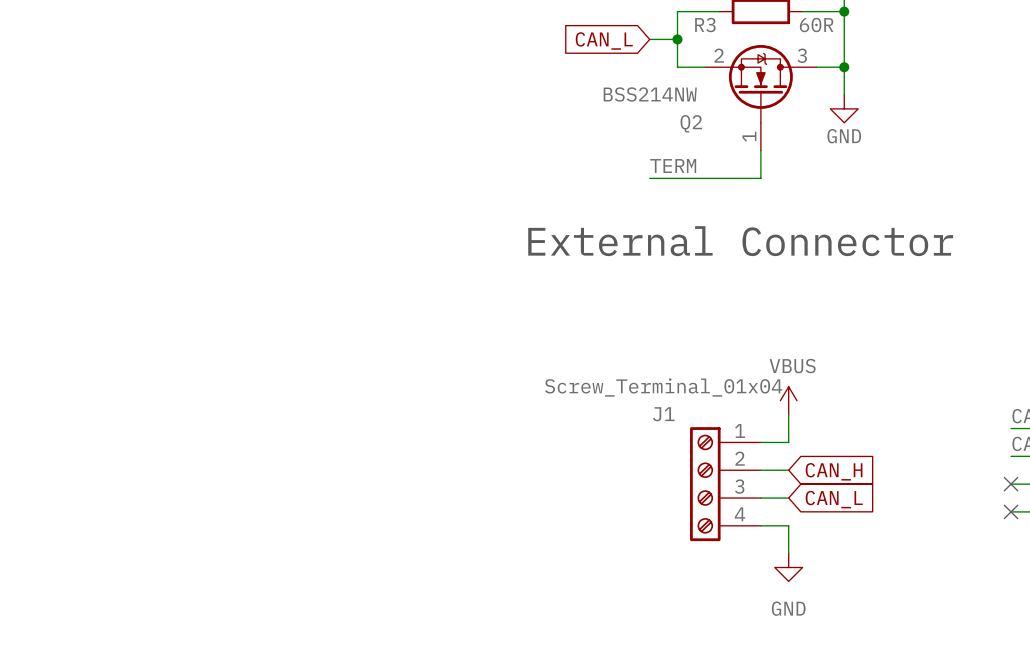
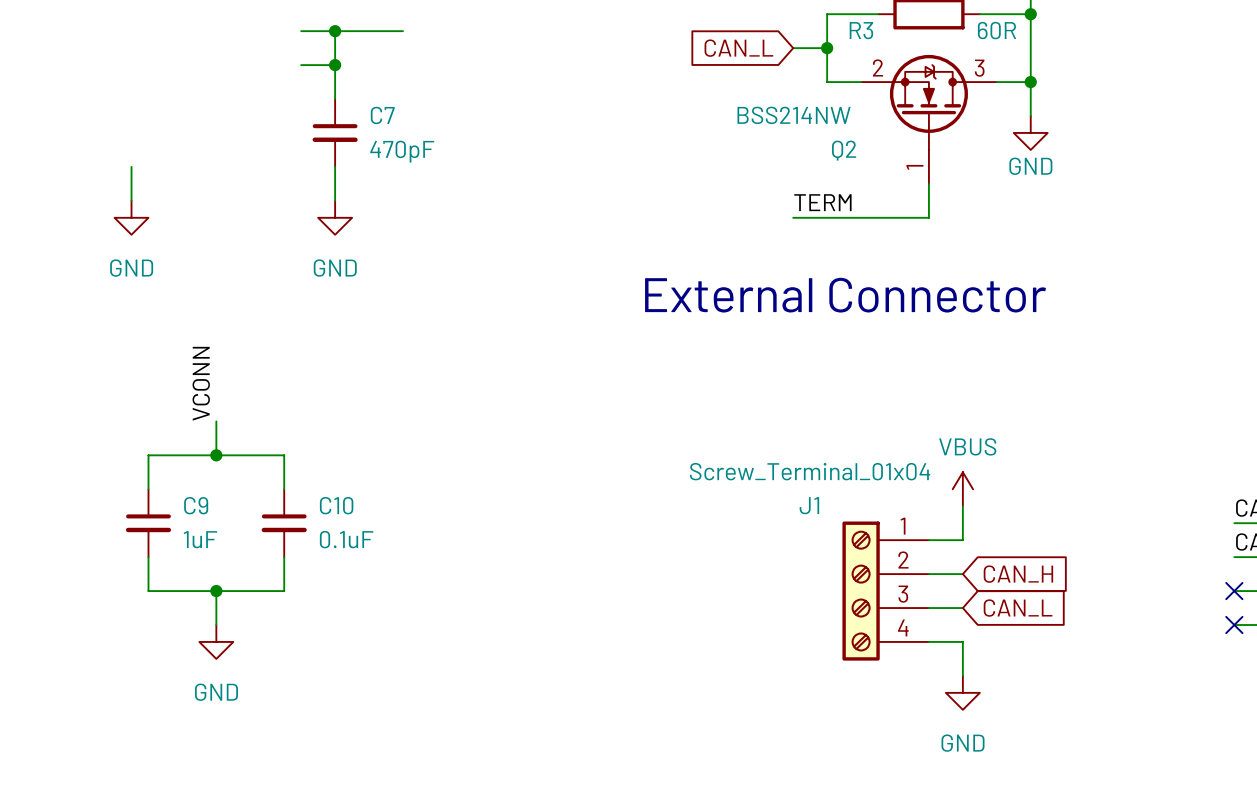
wire: none -> (301, 31) (402, 31)
wire: none -> (335, 31) (335, 99)
junction: none -> (335, 31)
wire: none -> (301, 65) (335, 65)
junction: none -> (335, 65)
C7: none -> 470pF (335, 132)
wire: none -> (131, 166) (131, 200)
wire: none -> (335, 166) (335, 200)
power symbol: none -> GND (131, 217)
power symbol: none -> GND (335, 217)
label: none -> VCONN (201, 383)
wire: none -> (216, 421) (216, 455)
junction: none -> (216, 455)
wire: none -> (148, 489) (148, 455) (284, 455) (284, 489)
C9: none -> 1uF (148, 523)
C10: none -> 0.1uF (284, 523)
wire: none -> (148, 557) (148, 591) (284, 591) (284, 557)
wire: none -> (216, 591) (216, 624)
junction: none -> (216, 591)
power symbol: none -> GND (216, 641)

